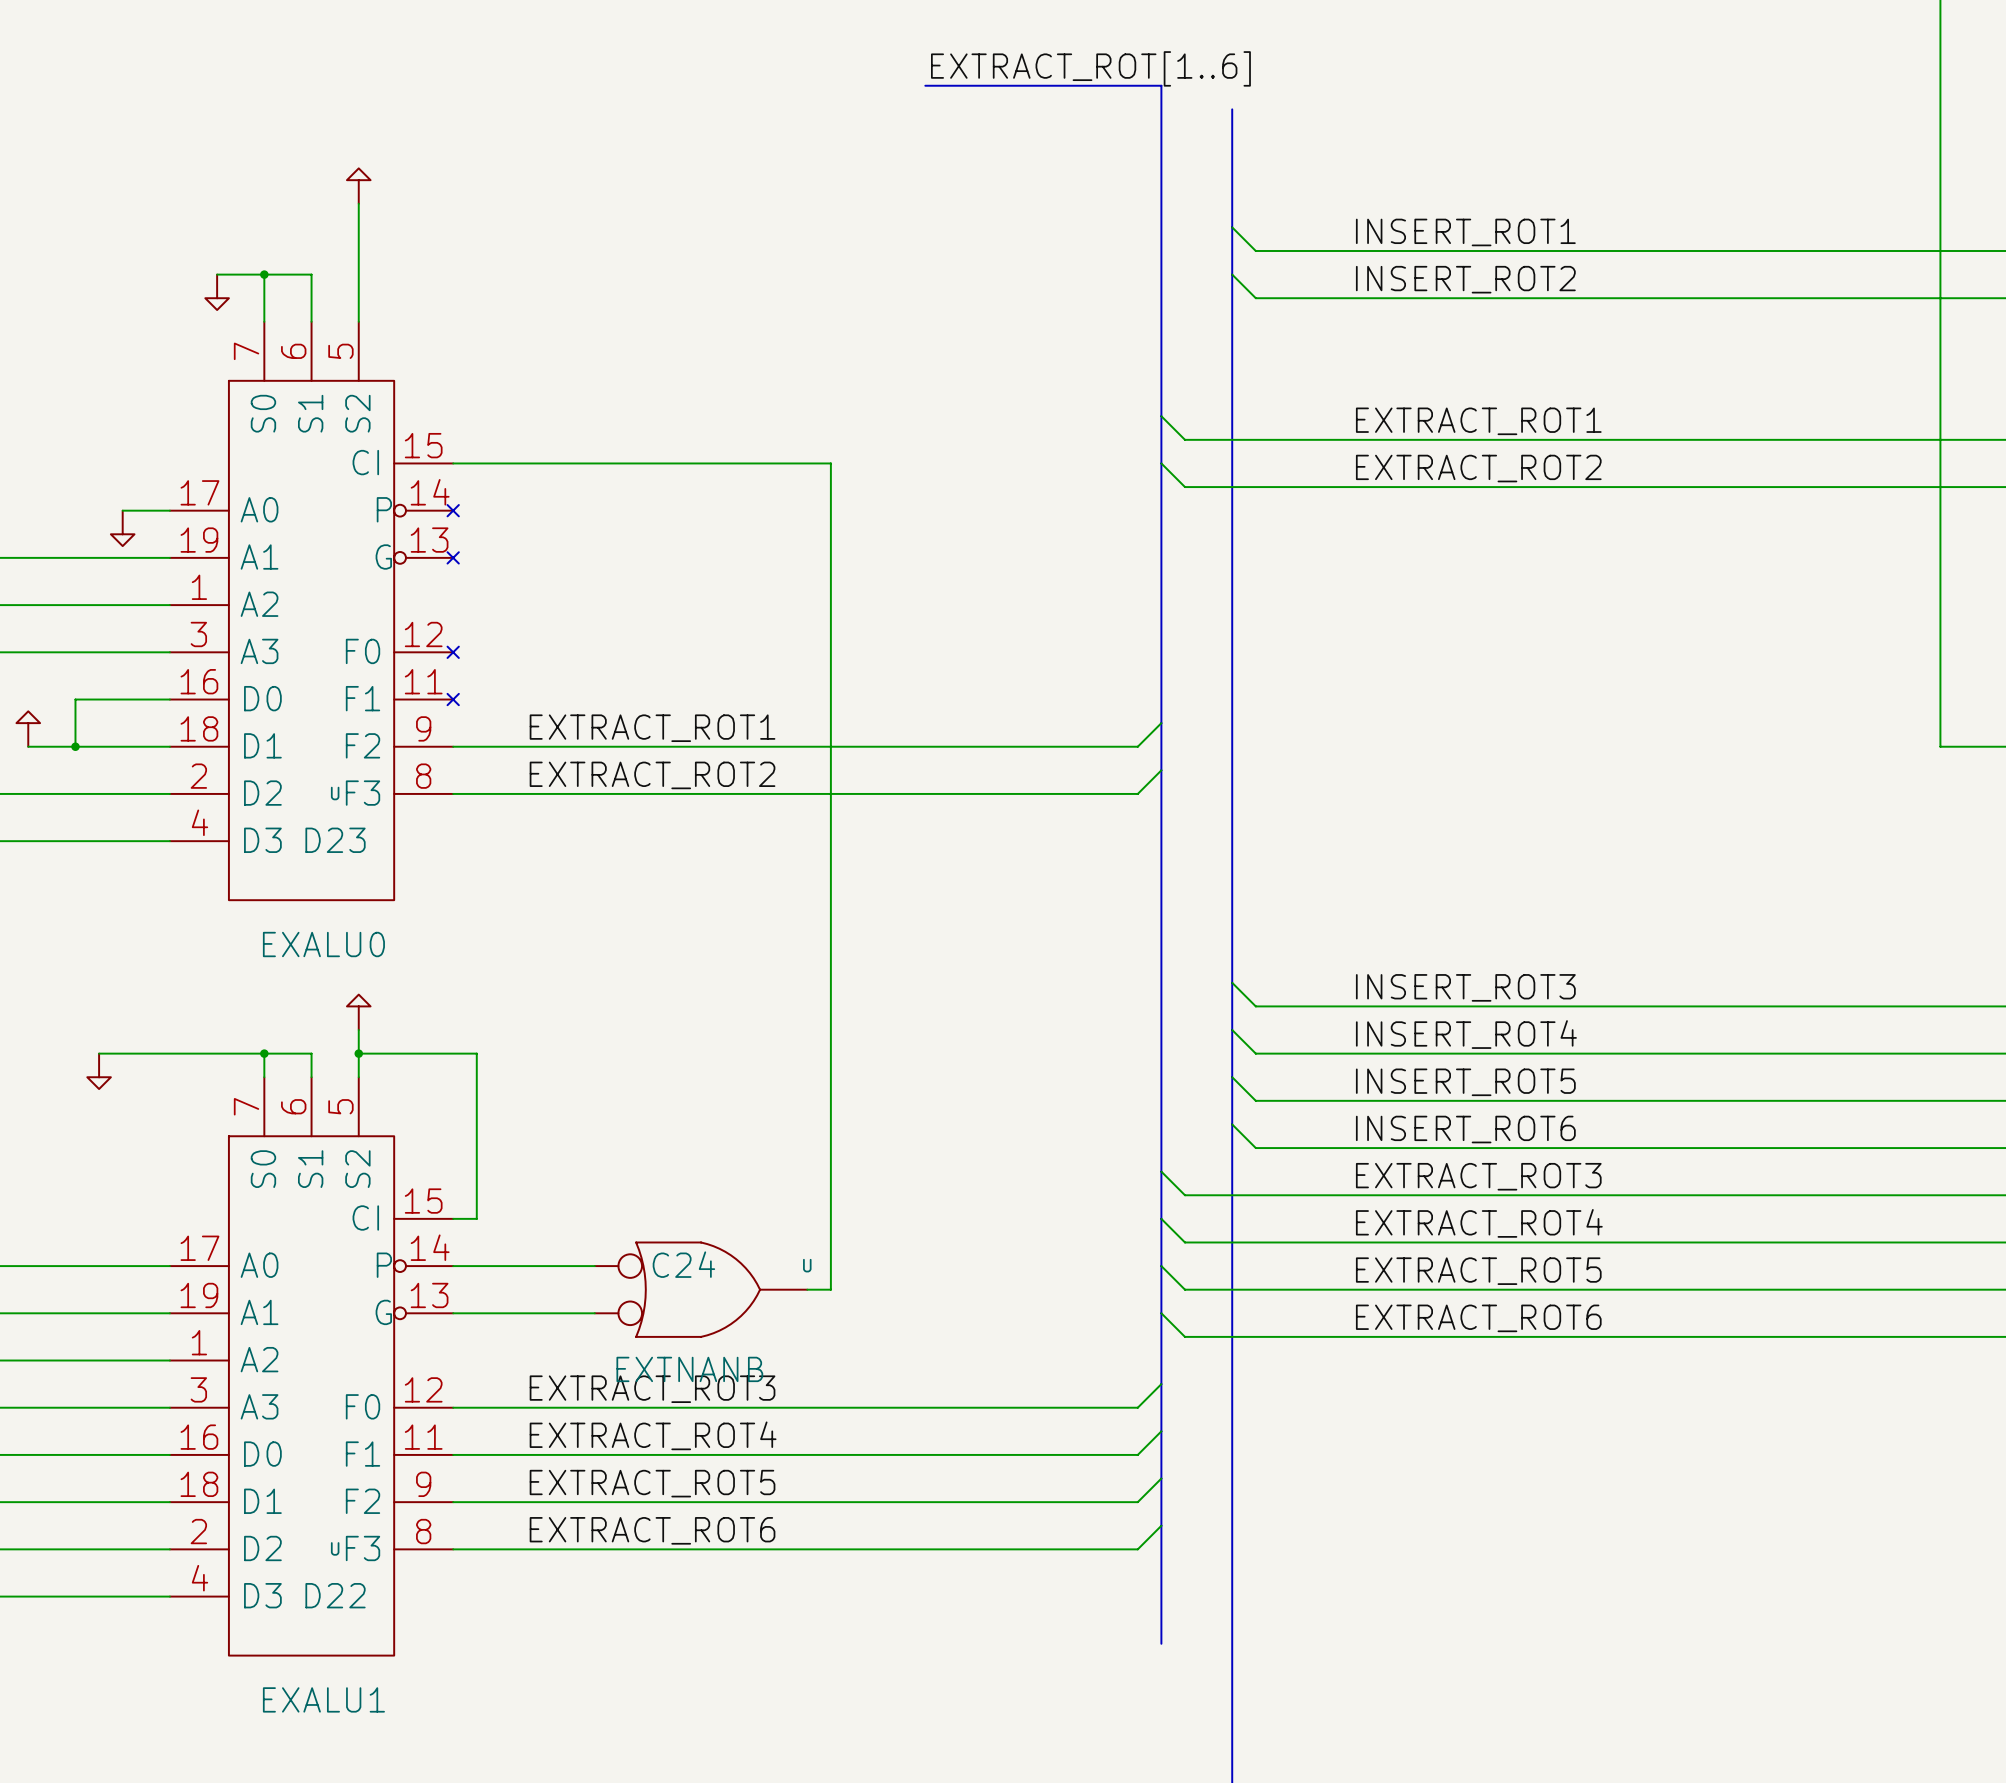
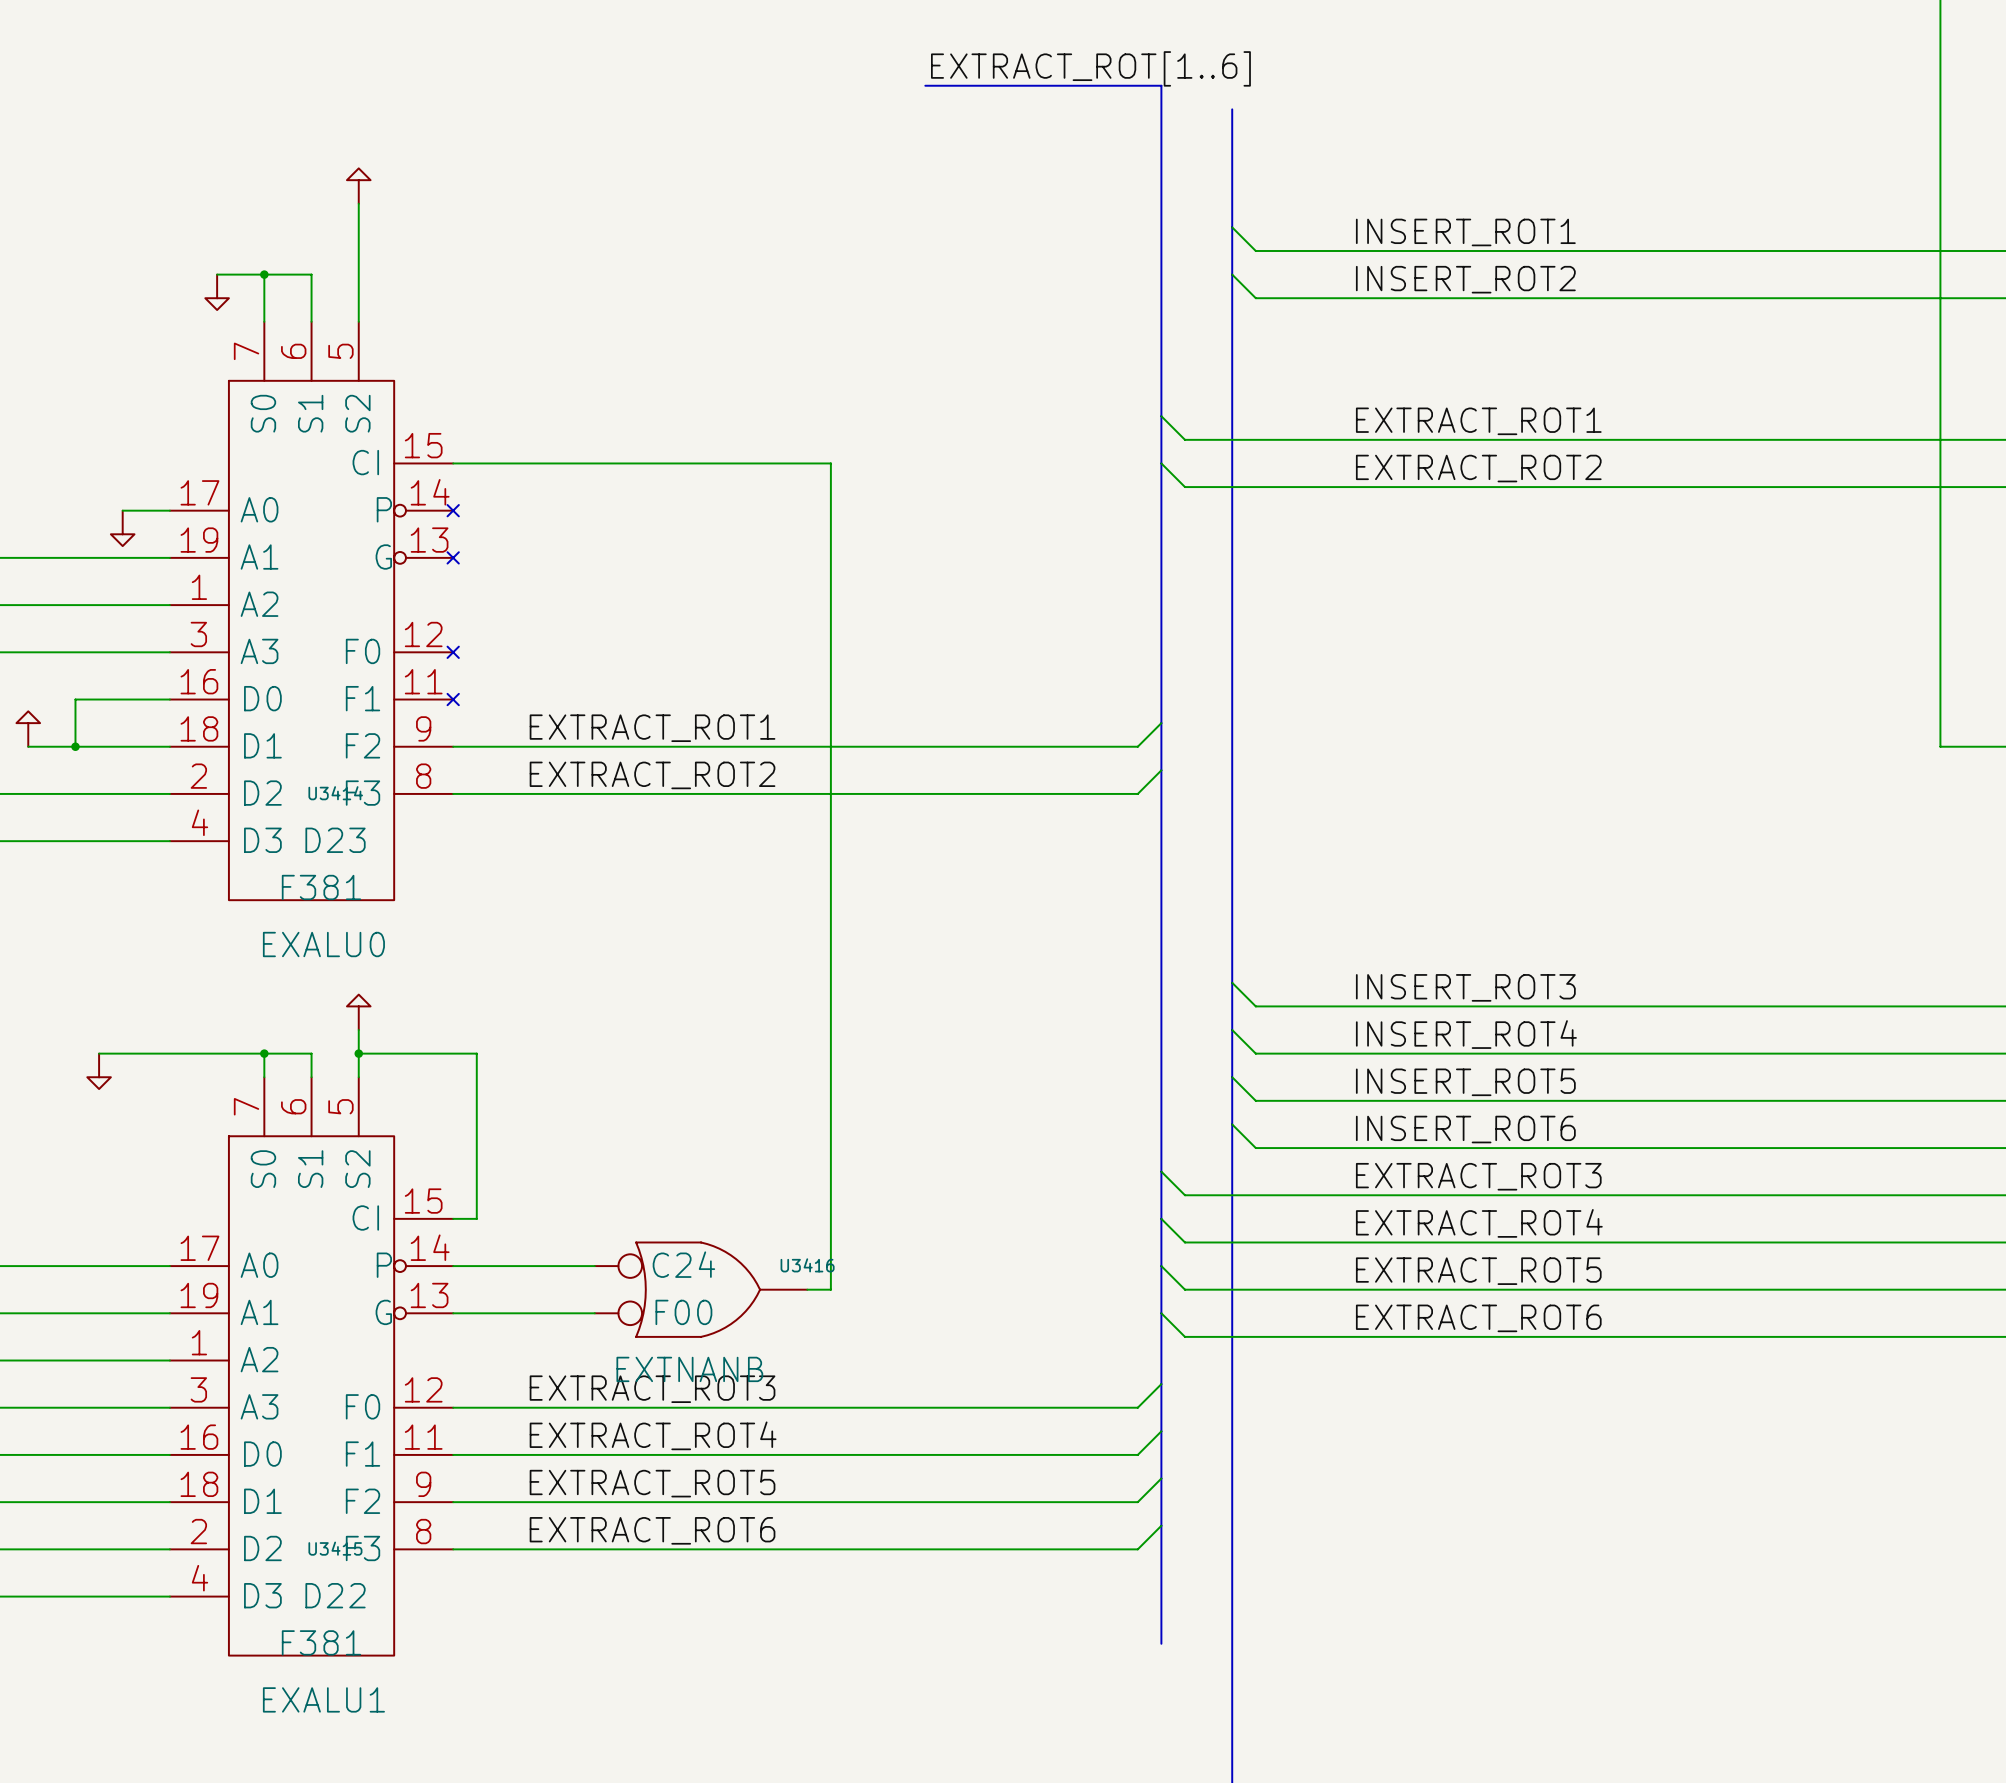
U name: U (335, 793) -> U3414 (335, 793)
U value: none -> F381 (321, 887)
U name: U (807, 1265) -> U3416 (807, 1265)
U value: none -> F00 (683, 1312)
U name: U (335, 1548) -> U3415 (335, 1548)
U value: none -> F381 (321, 1642)

